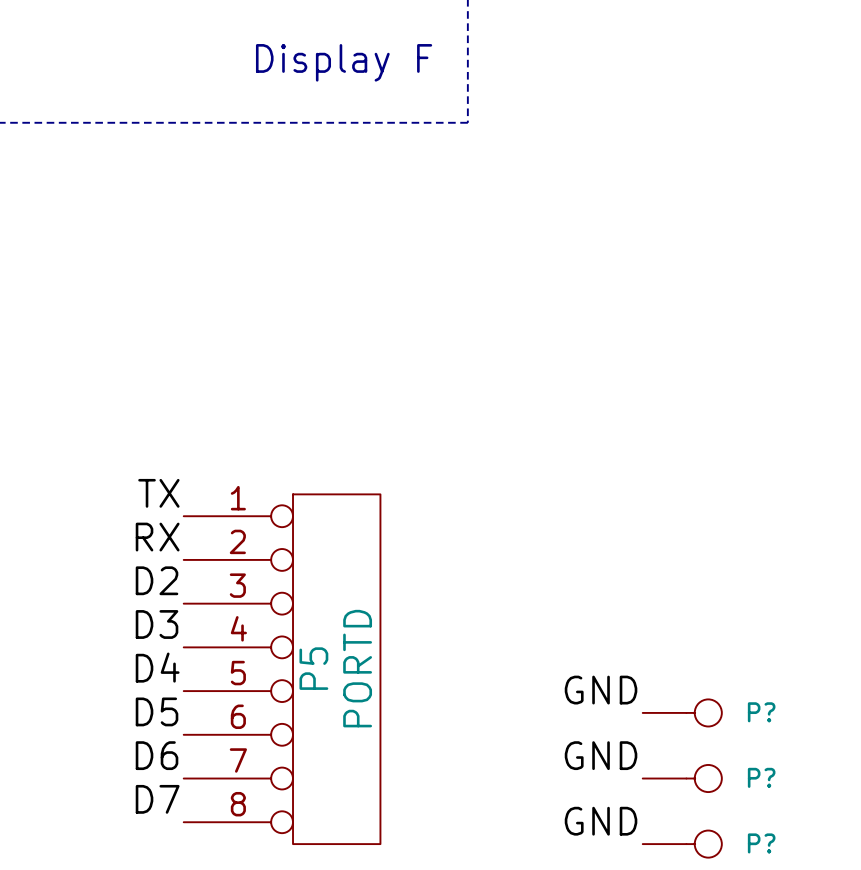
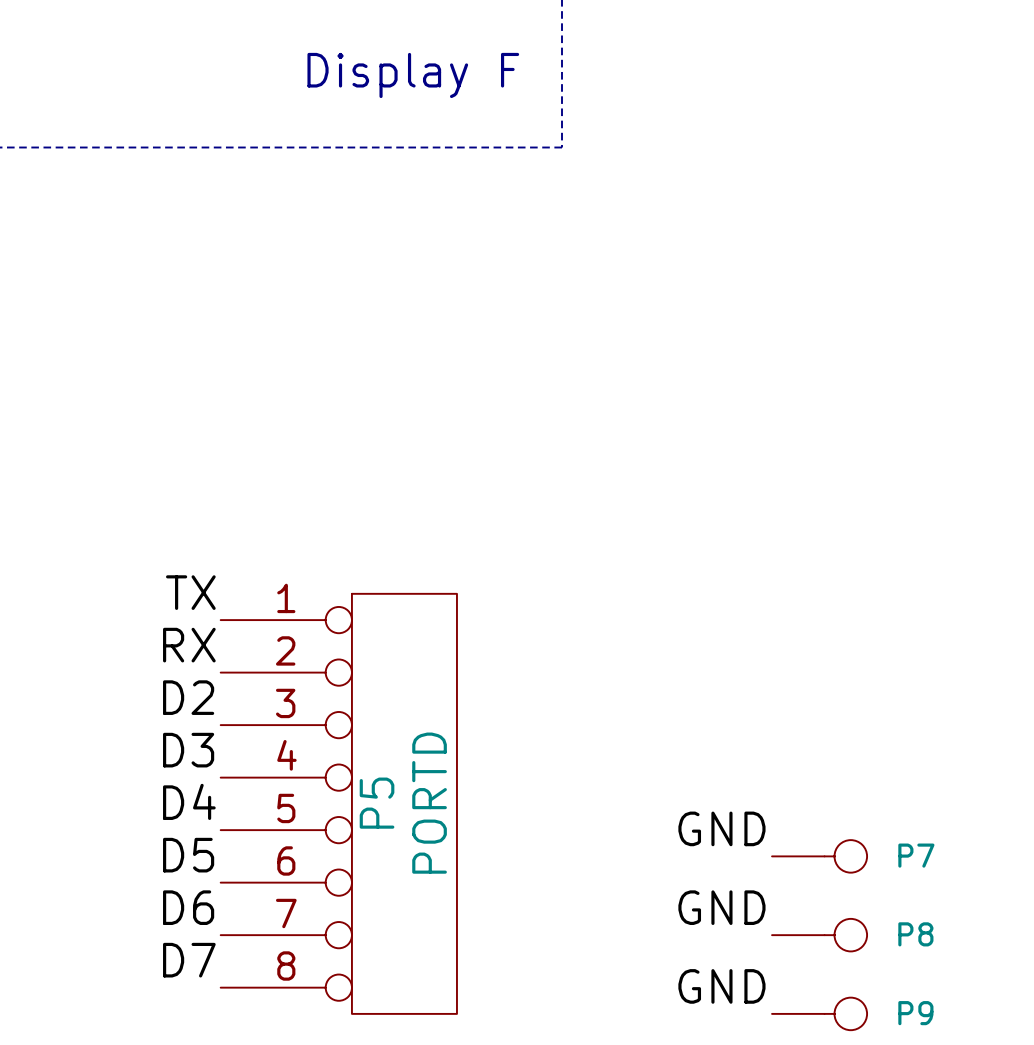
P? name: P? (761, 712) -> P7 (916, 855)
P? name: P? (761, 777) -> P8 (915, 934)
P? name: P? (761, 843) -> P9 (915, 1013)

